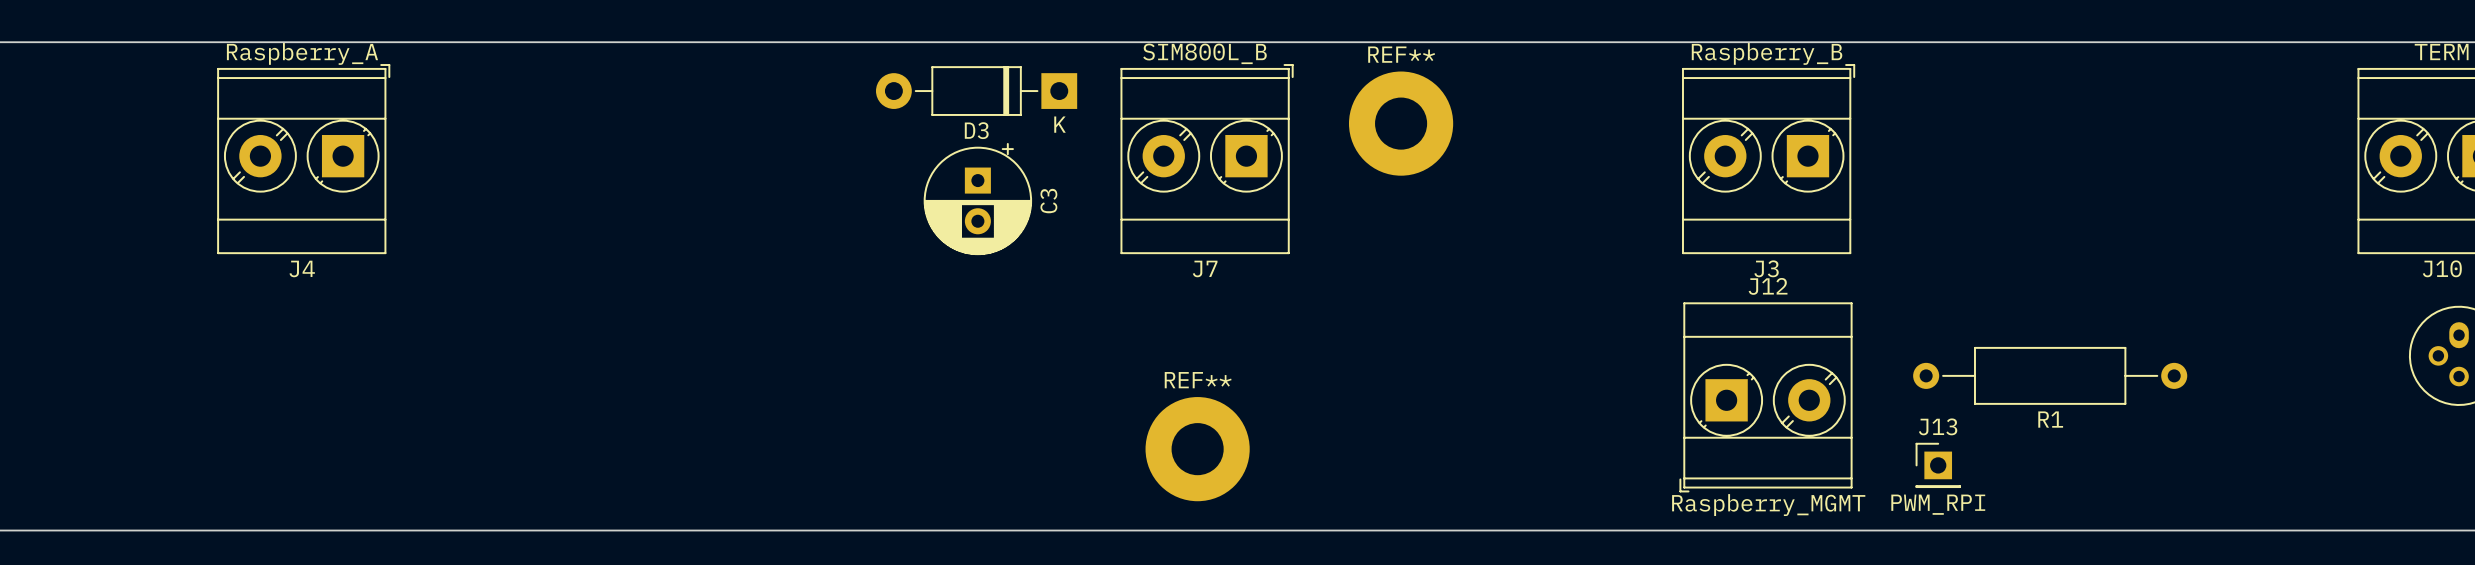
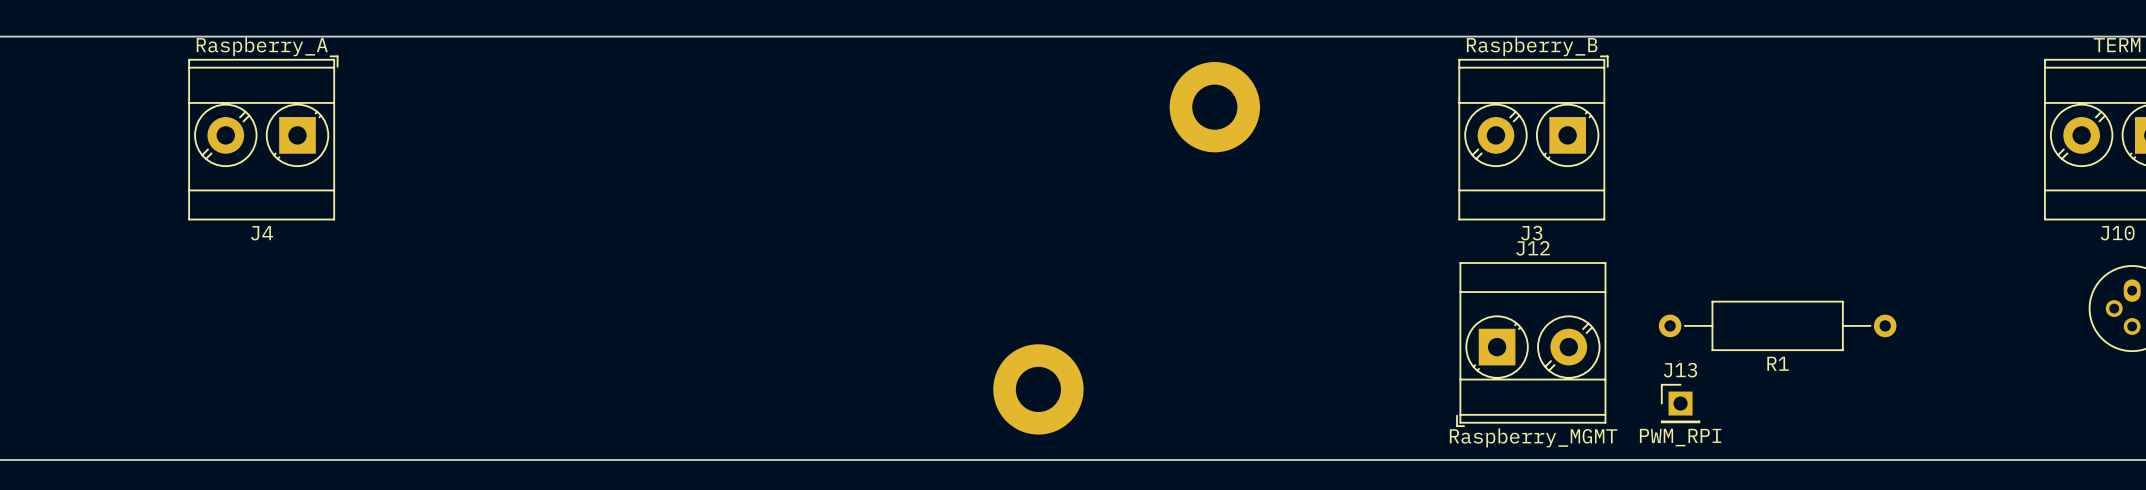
REF** name: REF** (1401, 54) -> none
D3: (976, 91) -> none
J7: SIM800L_B (1207, 159) -> none
C3: (977, 199) -> none
REF** name: REF** (1198, 380) -> none

